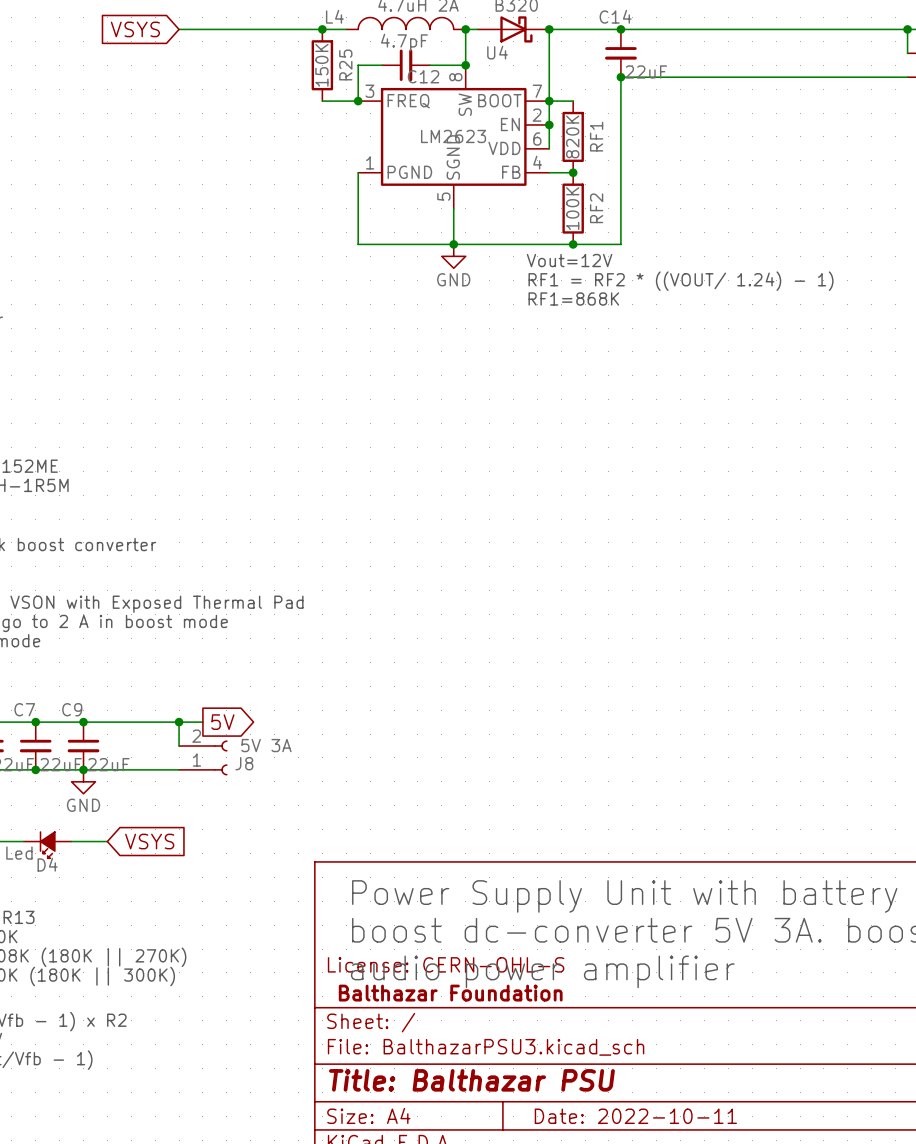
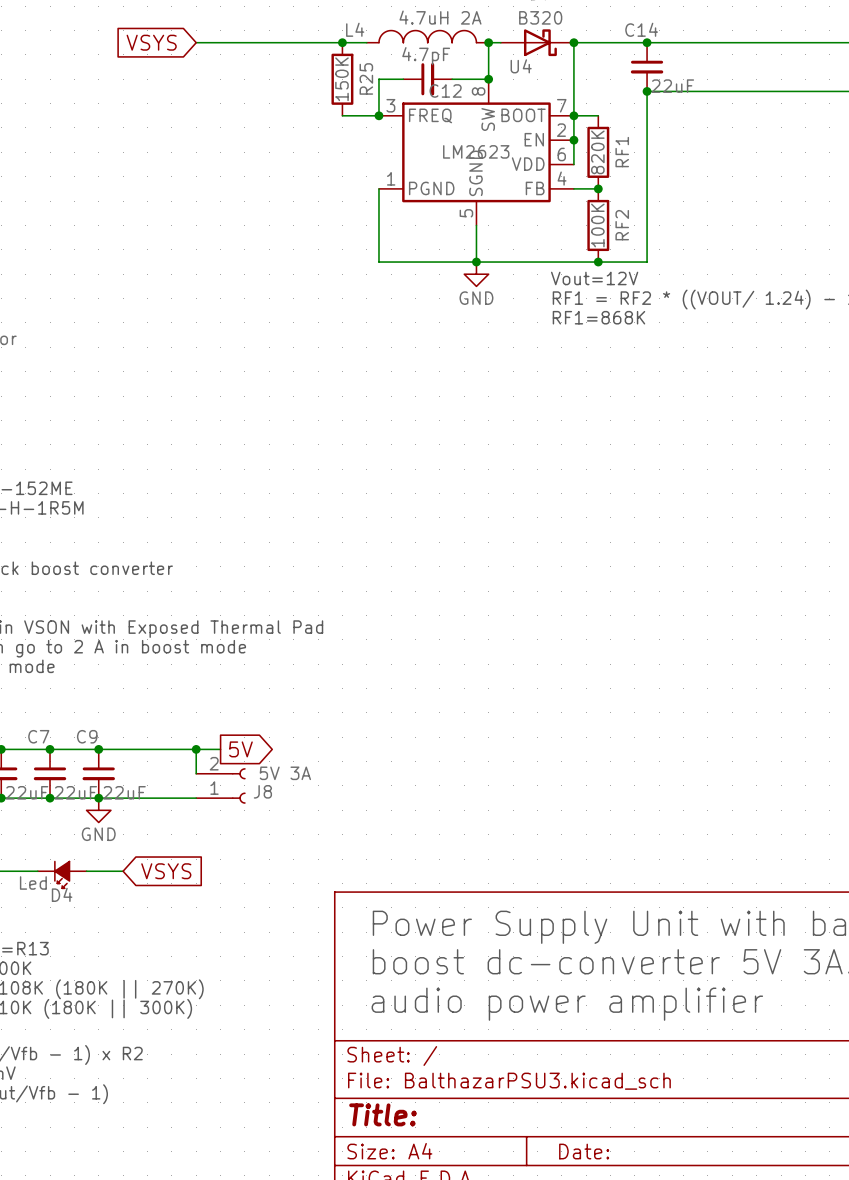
title block: License: CERN-OHL-S (446, 964) -> none
title block: Balthazar Foundation (450, 993) -> none
title block: Title: Balthazar PSU (471, 1080) -> Title: (383, 1114)
title block: Date: 2022-10-11 (635, 1116) -> Date: (584, 1151)

